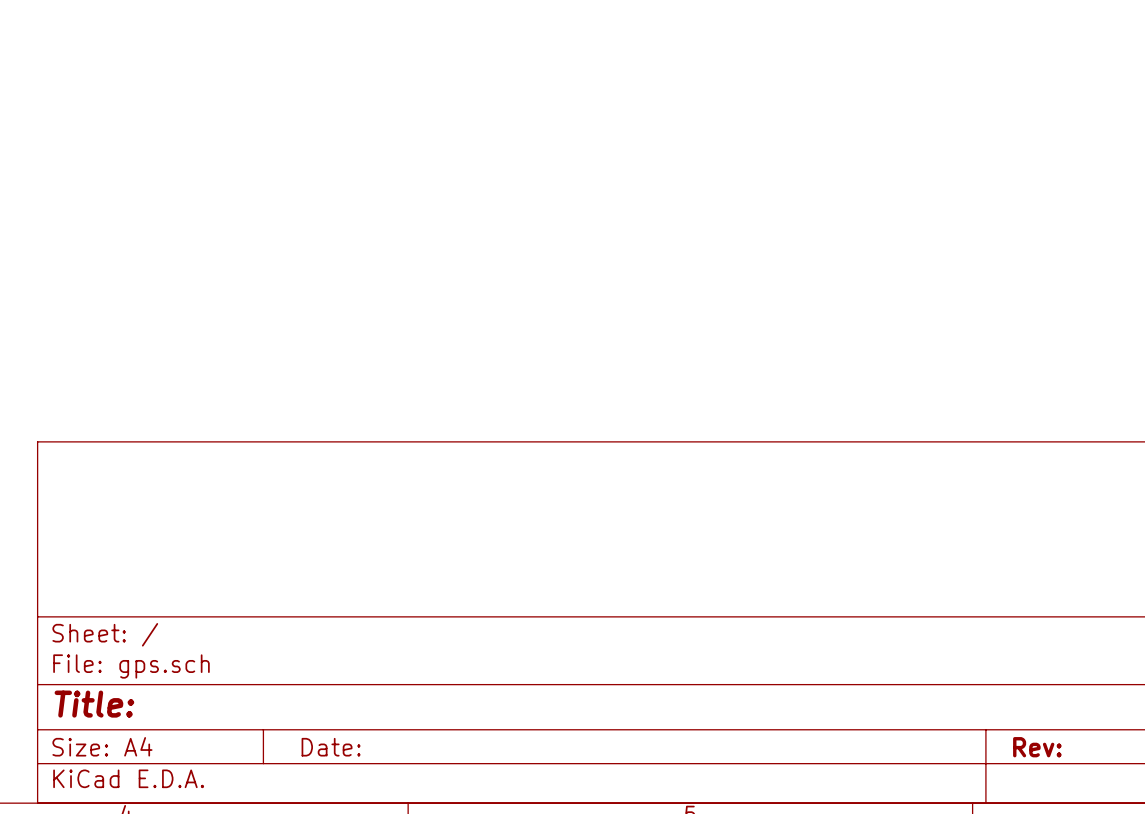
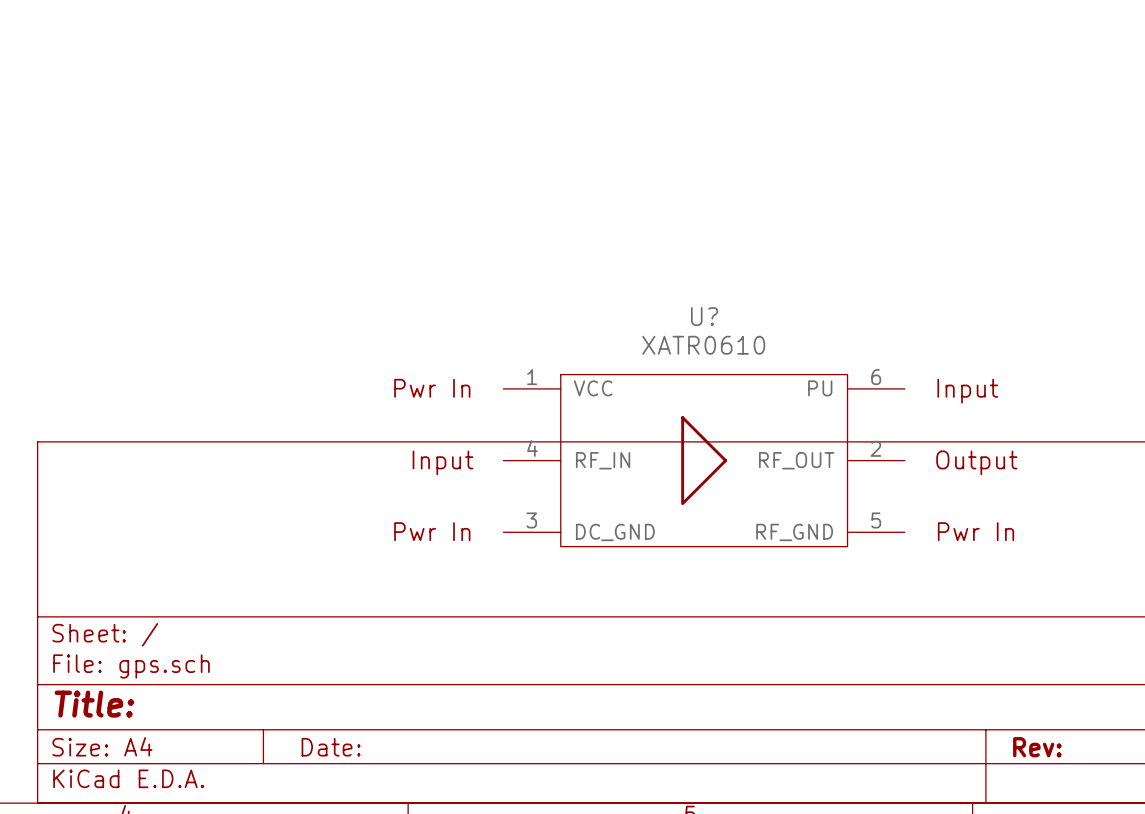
U?: none -> XATR0610 (704, 460)

